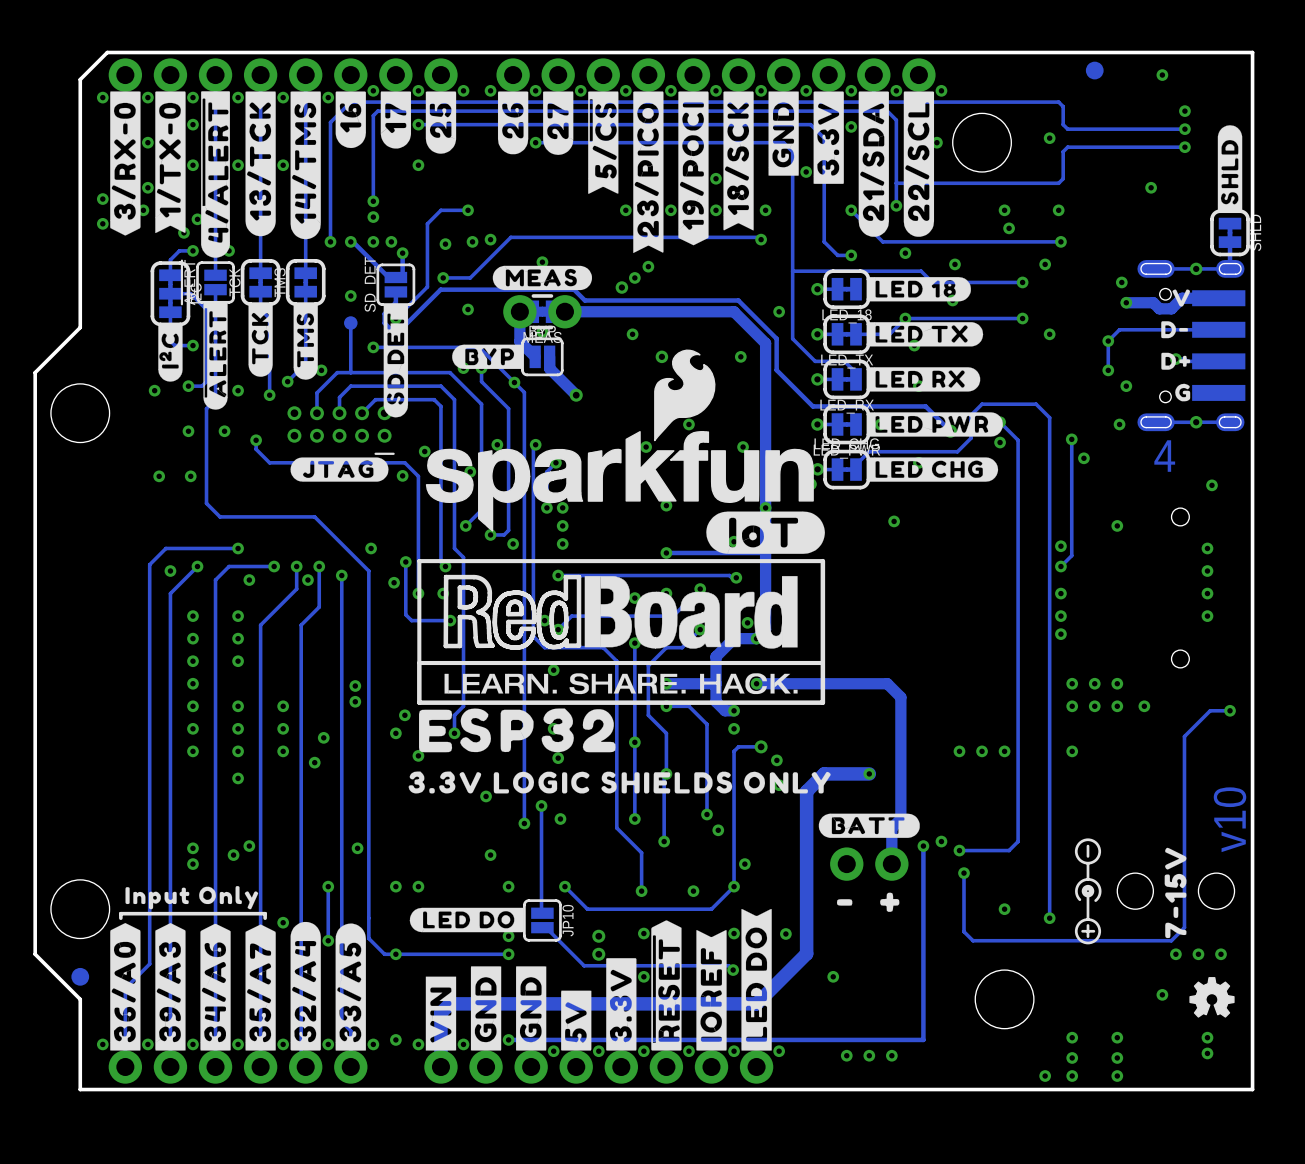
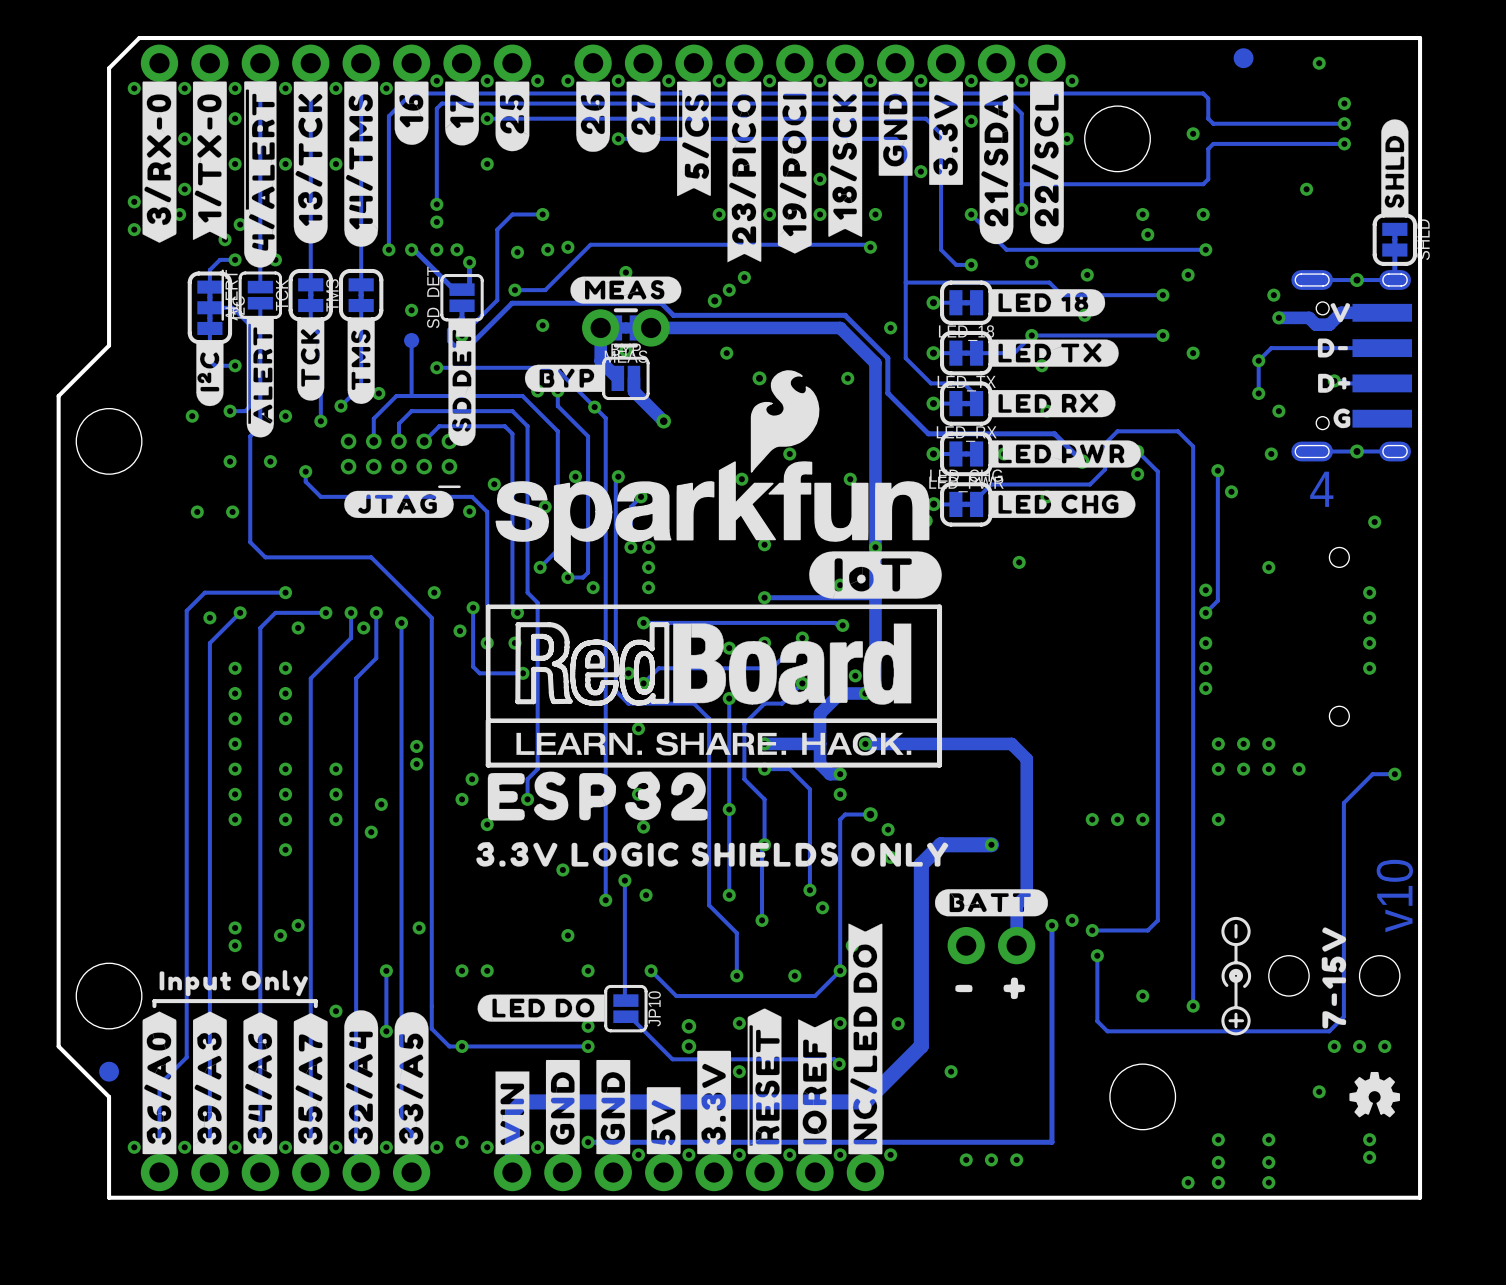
drawing: none -> [848, 923, 883, 1155]
drawing: [741, 909, 772, 1051] -> none

